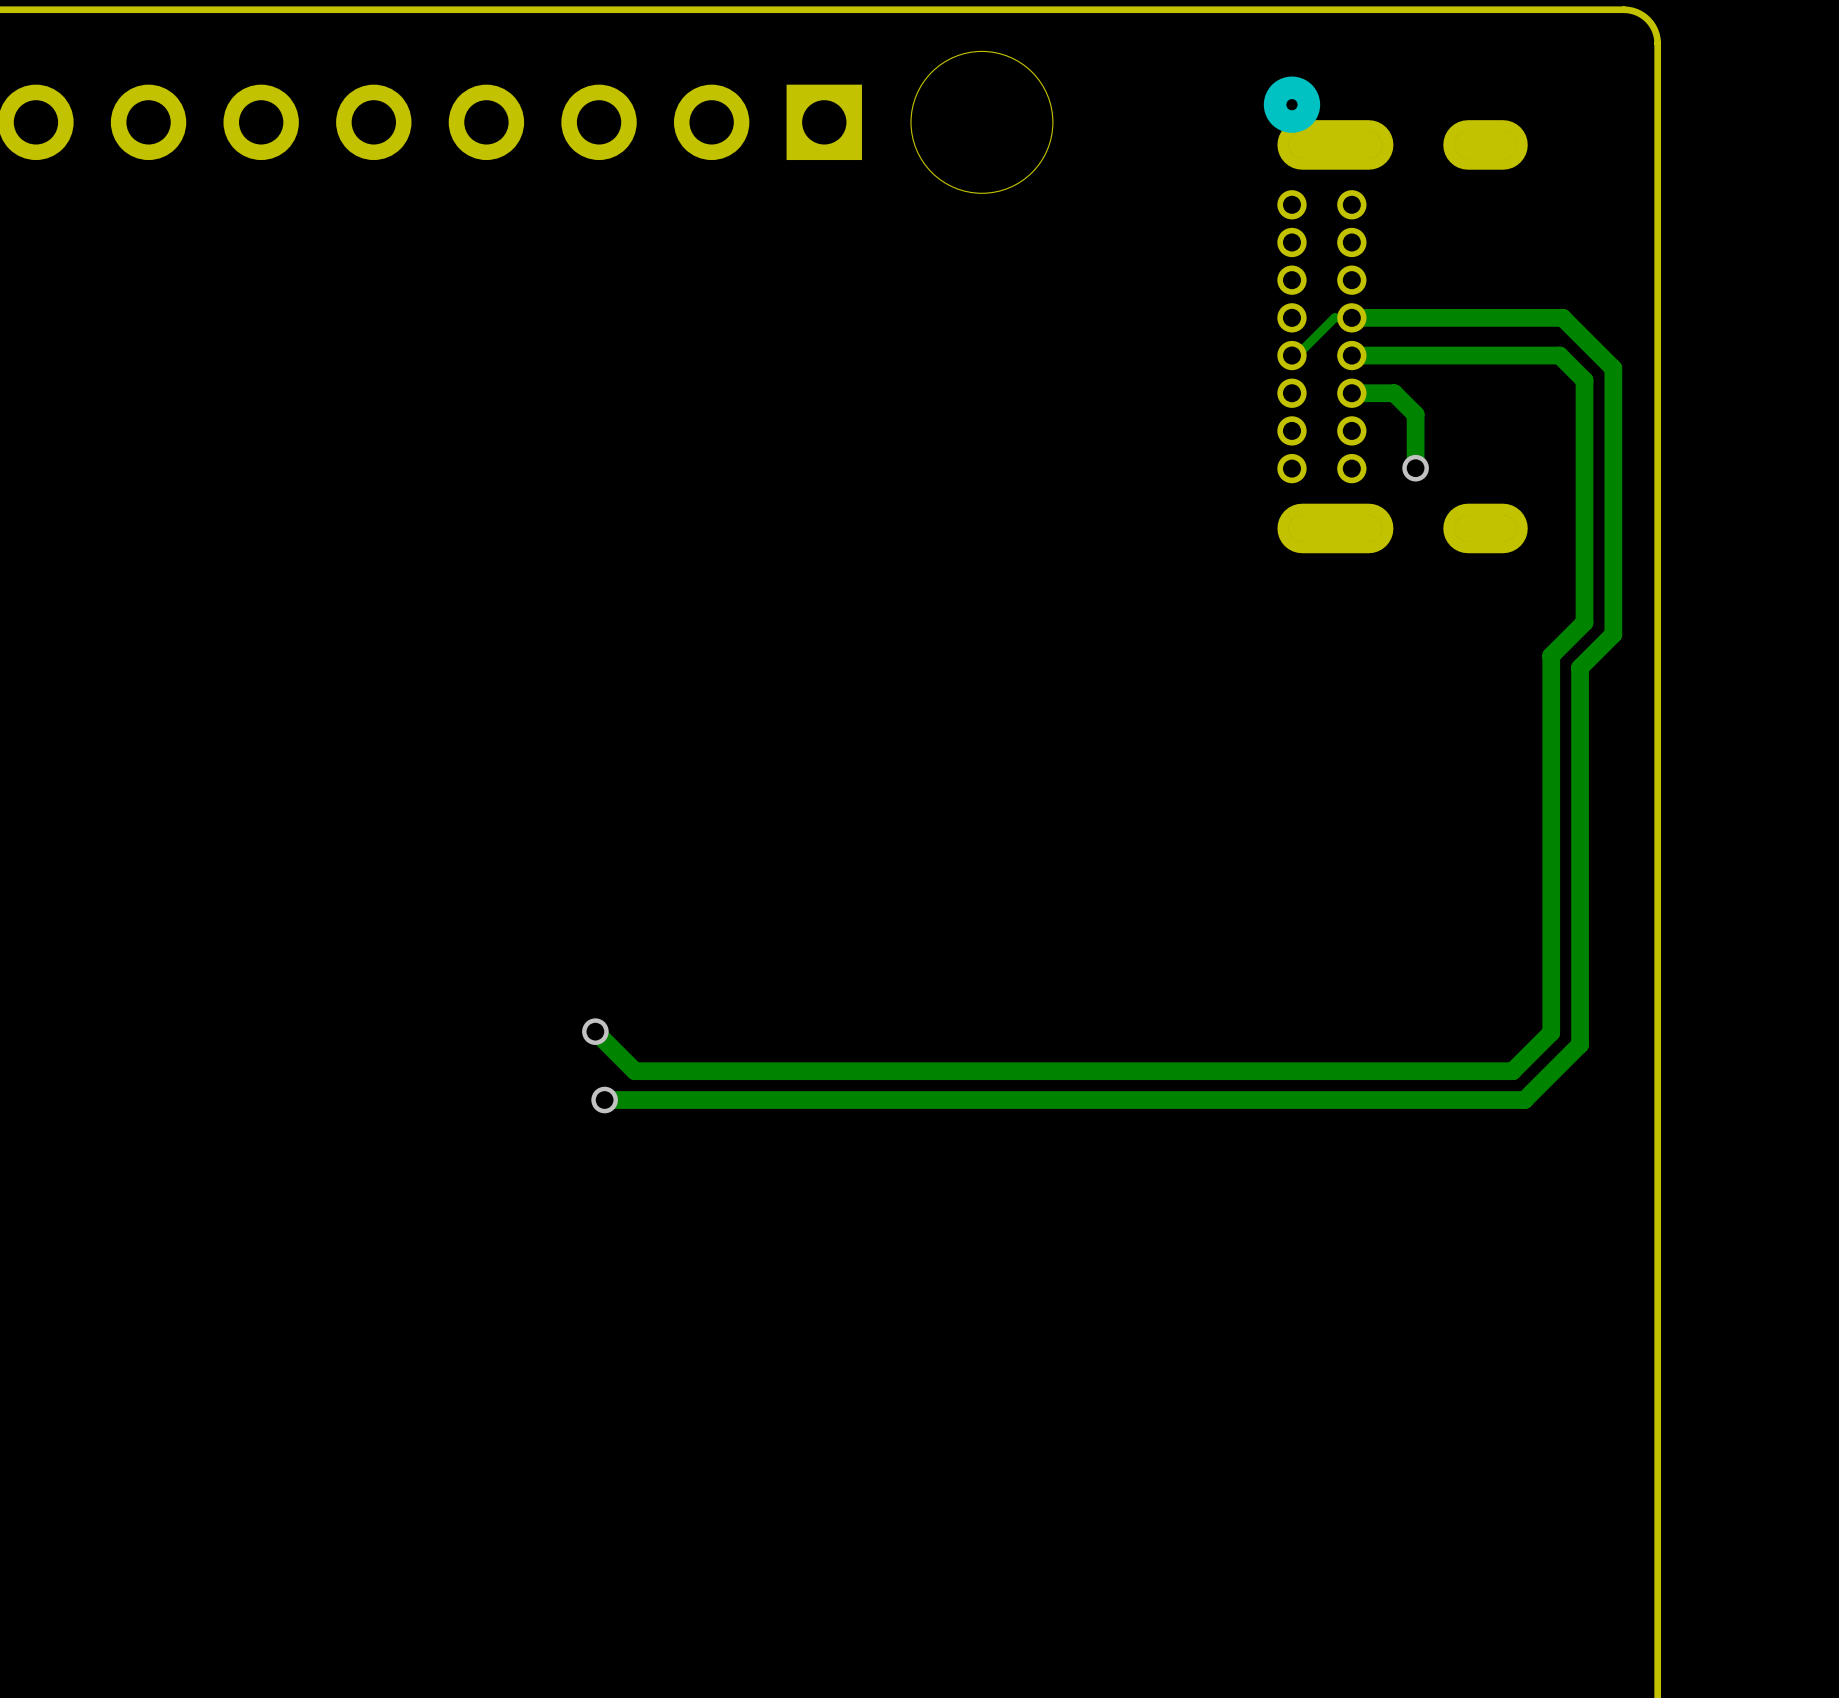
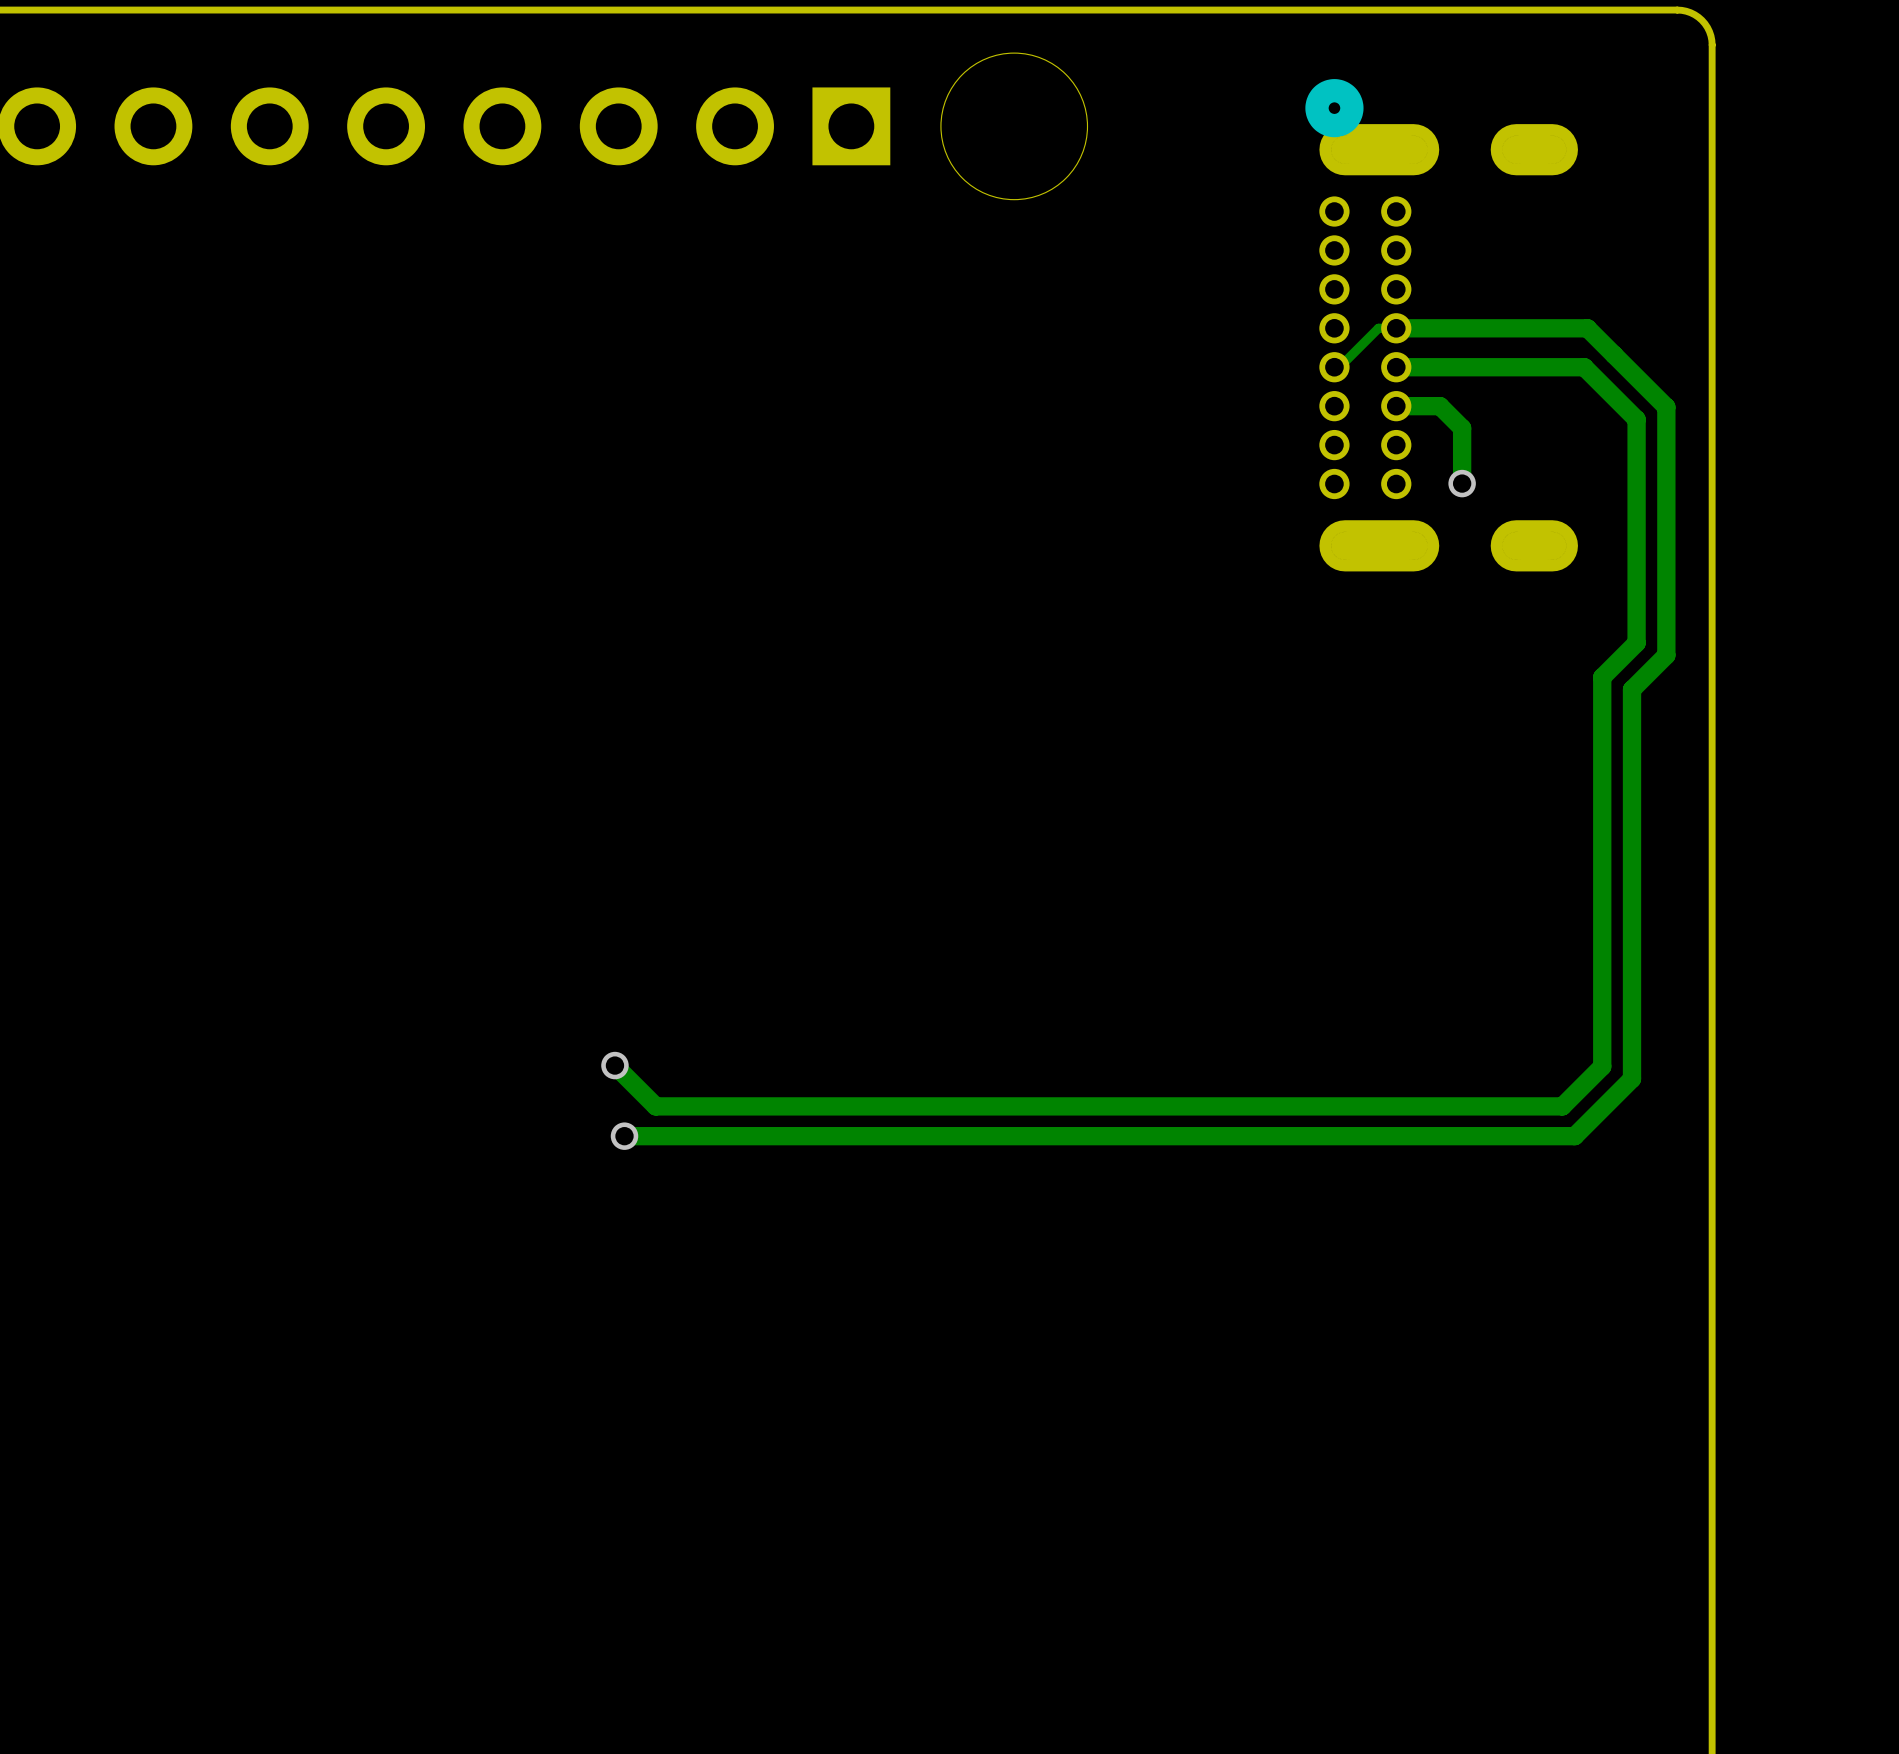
track: (1537, 317) (1562, 317) (1613, 368) (1613, 394) -> (1587, 328) (1666, 407)
track: (1533, 355) (1559, 355) (1584, 380) (1584, 406) -> (1584, 367) (1636, 419)

